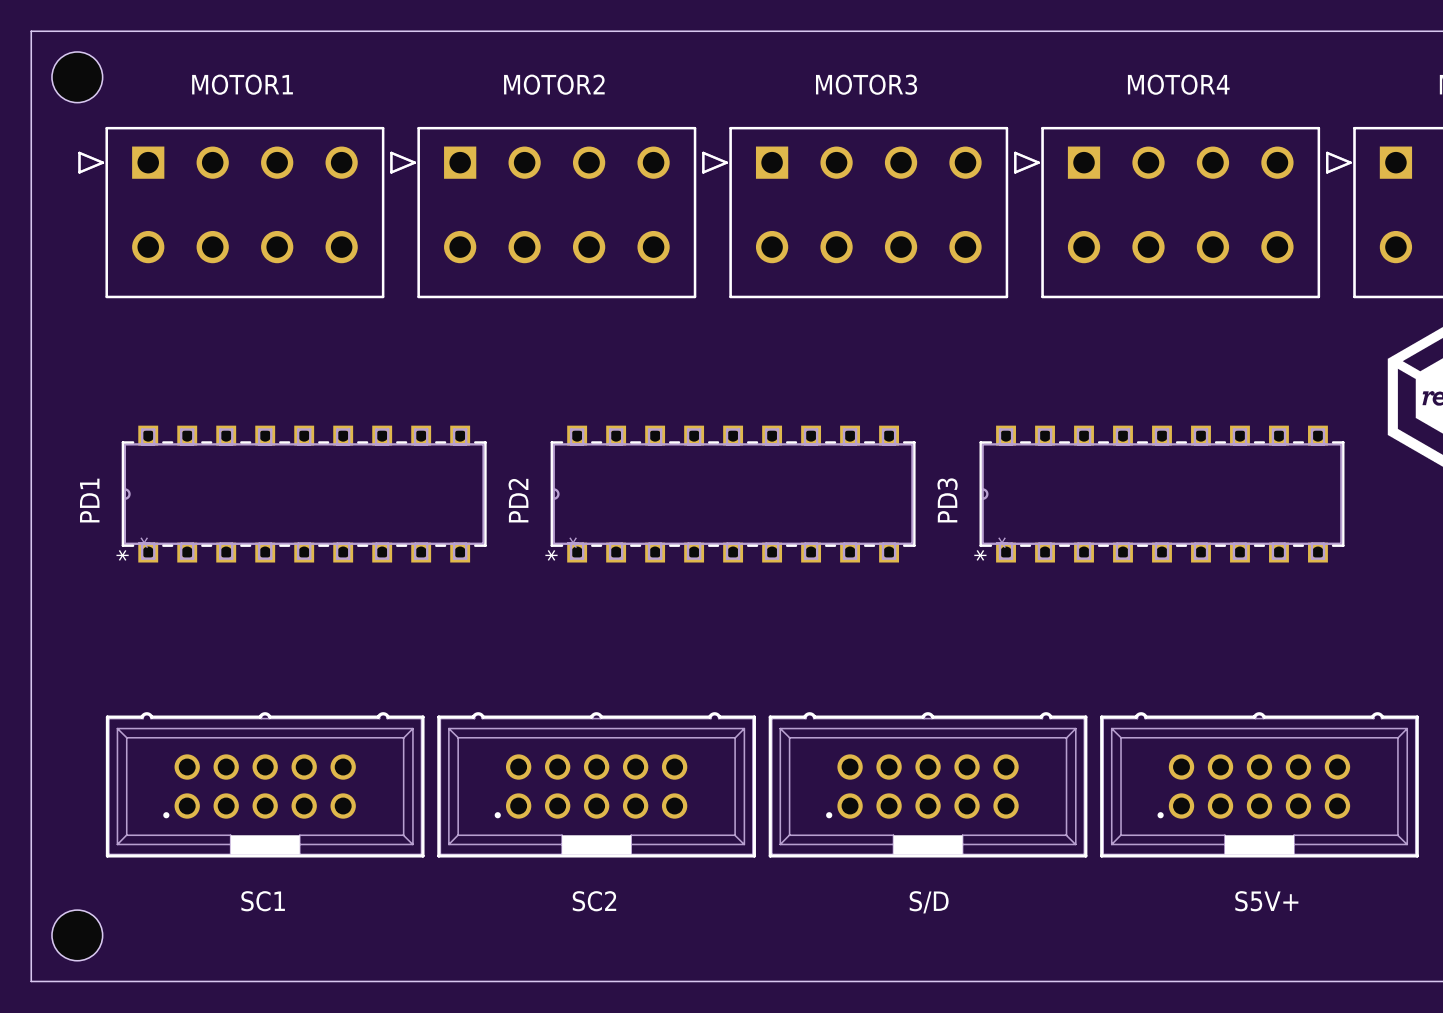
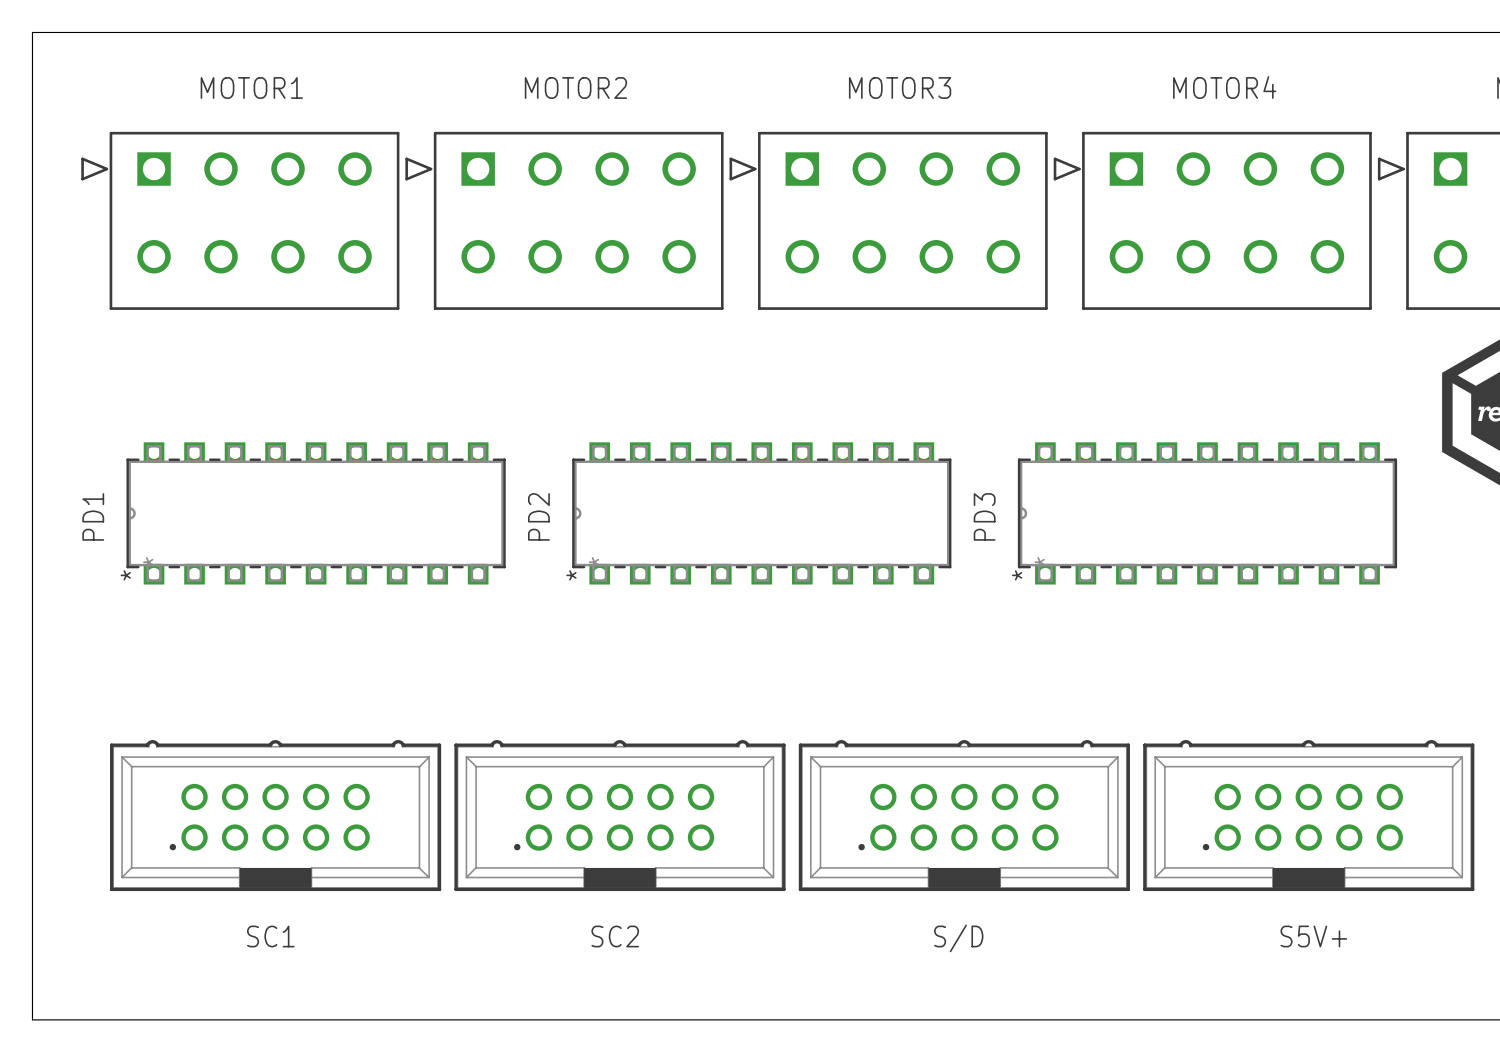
hole: (77, 77) -> none
hole: (77, 935) -> none

